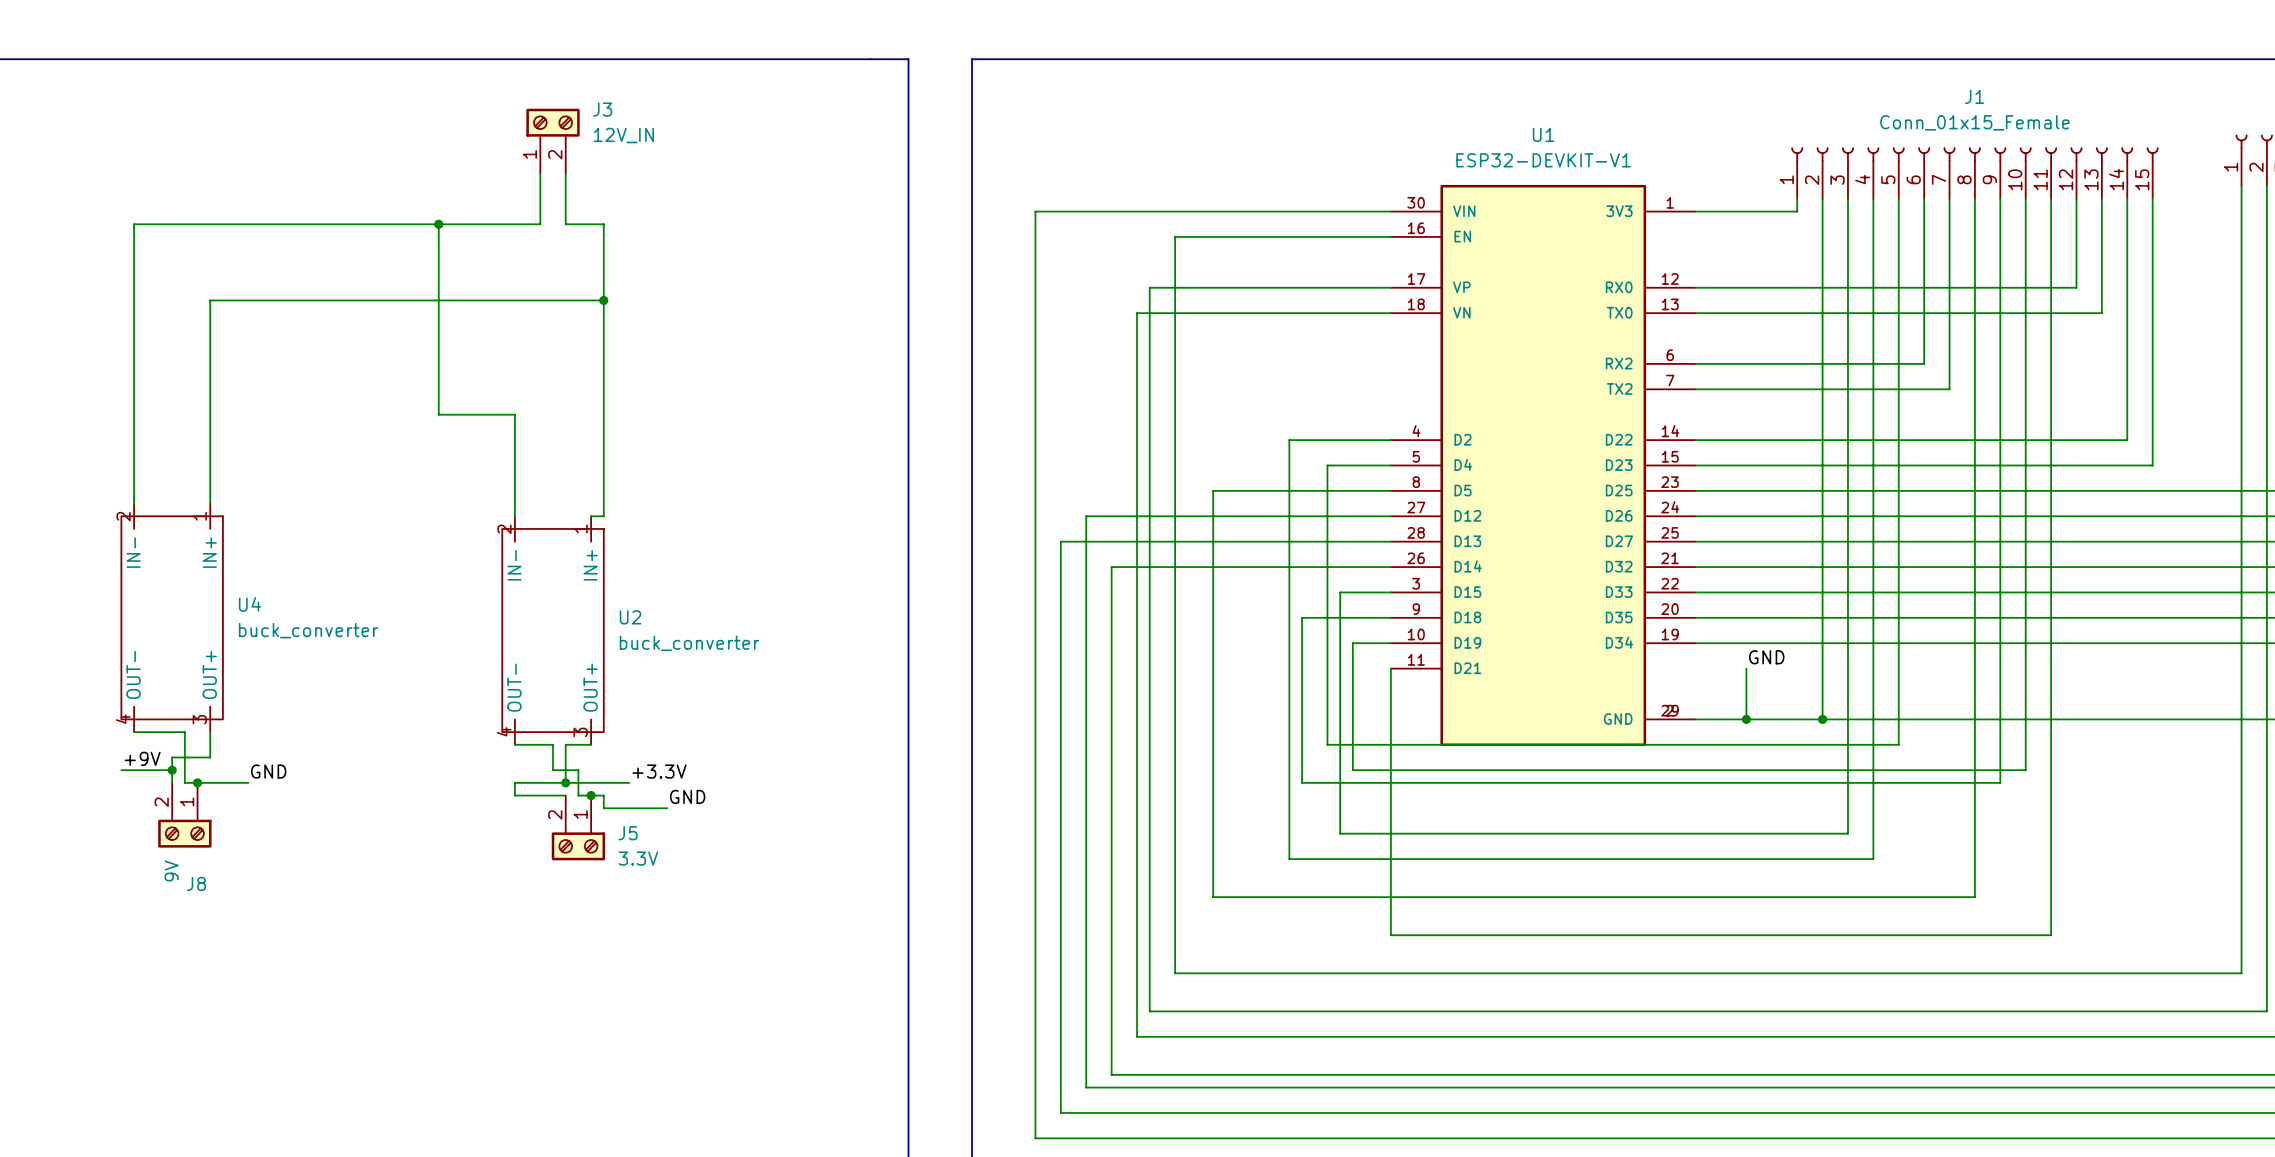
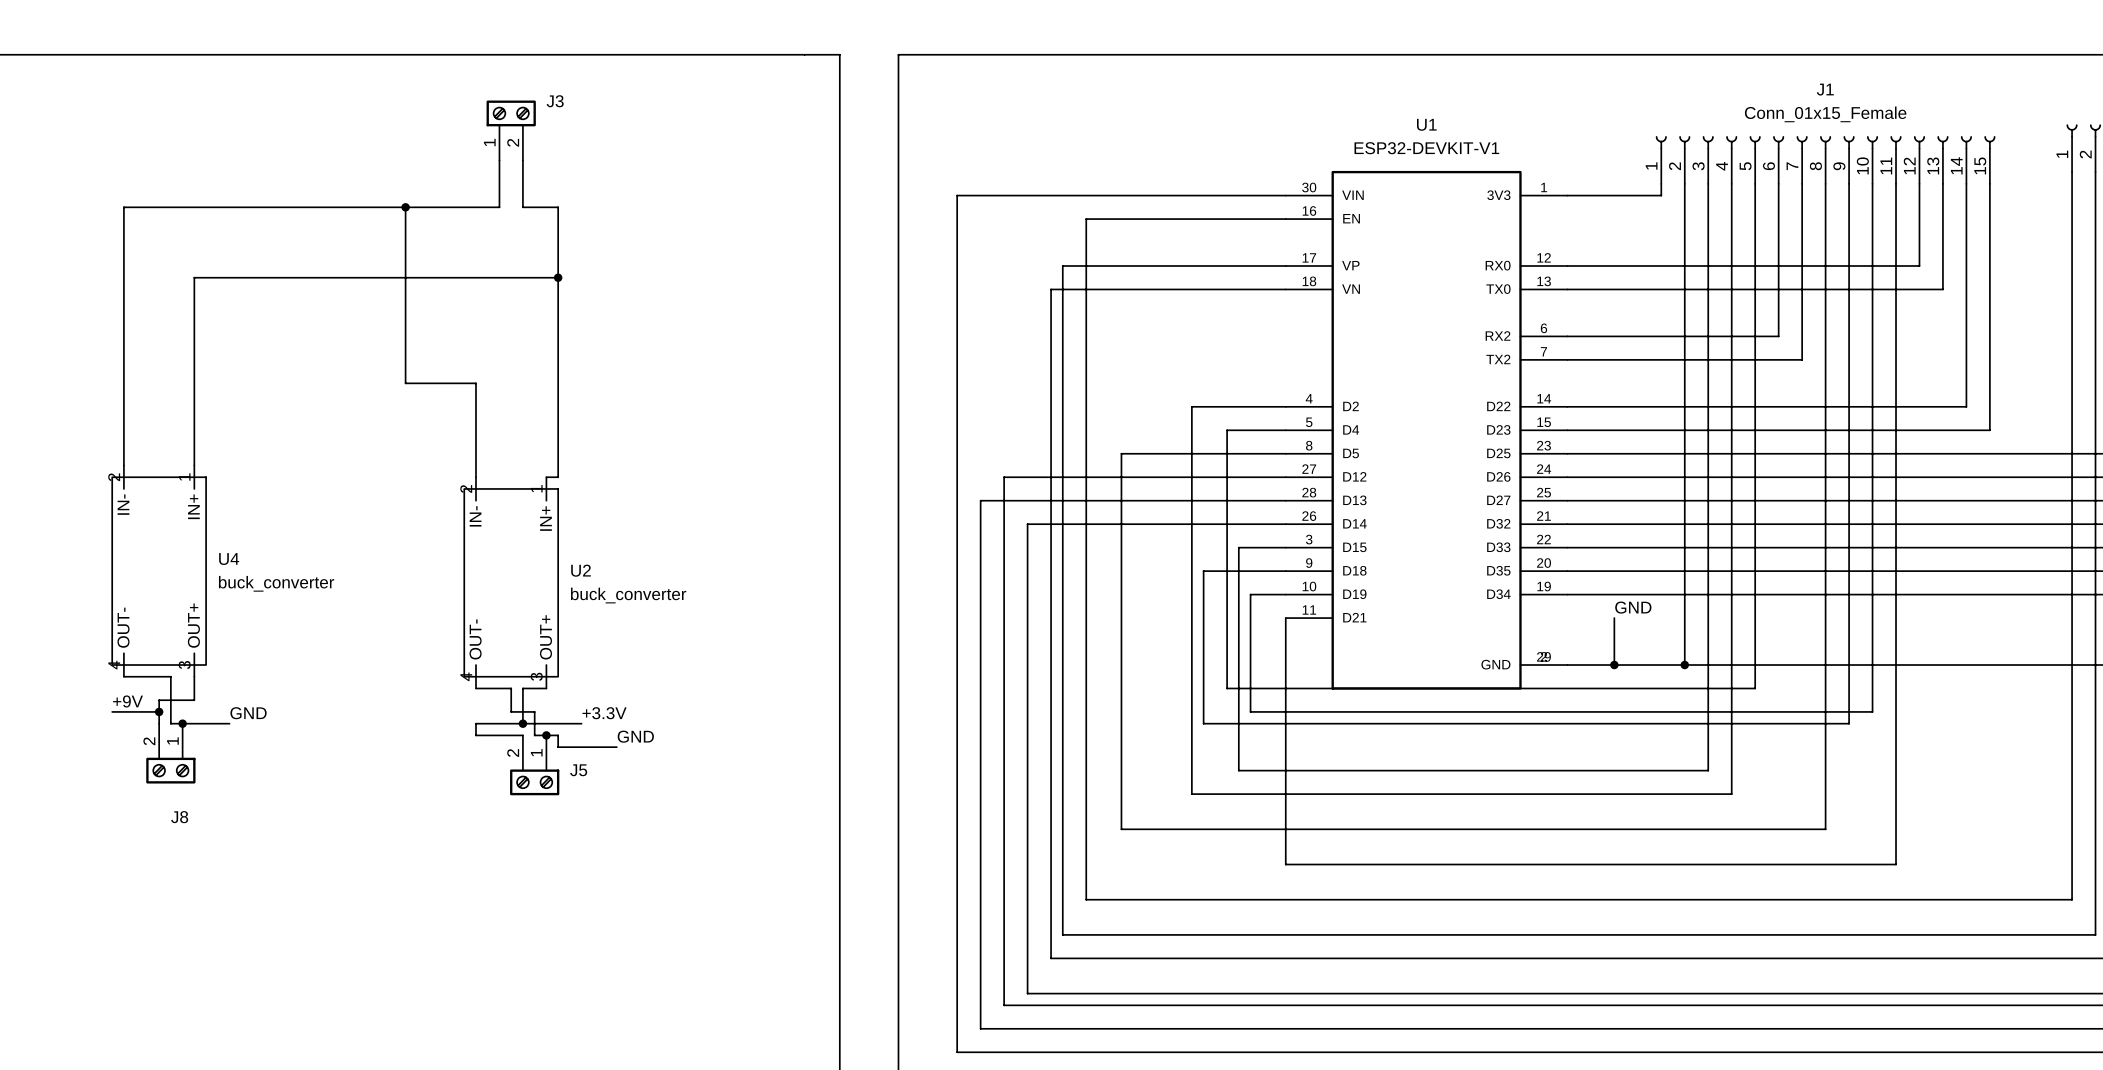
J3 value: 12V_IN (623, 135) -> none
J5 value: 3.3V (638, 858) -> none
J8 value: 9V (171, 870) -> none

